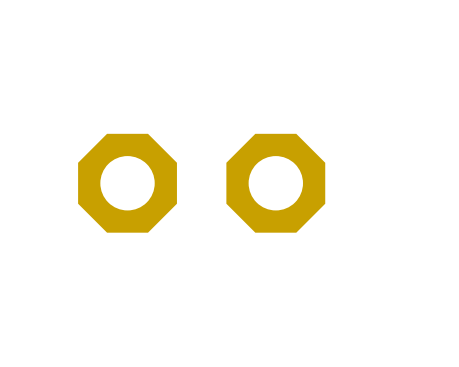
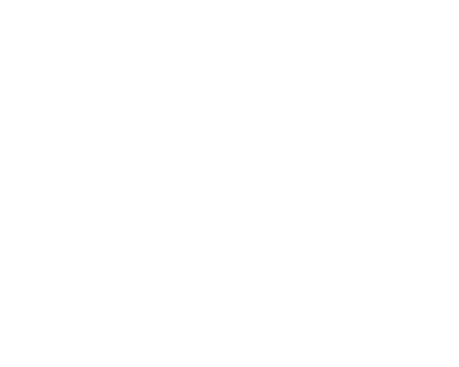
part: (127, 183) -> none
part: (275, 183) -> none

